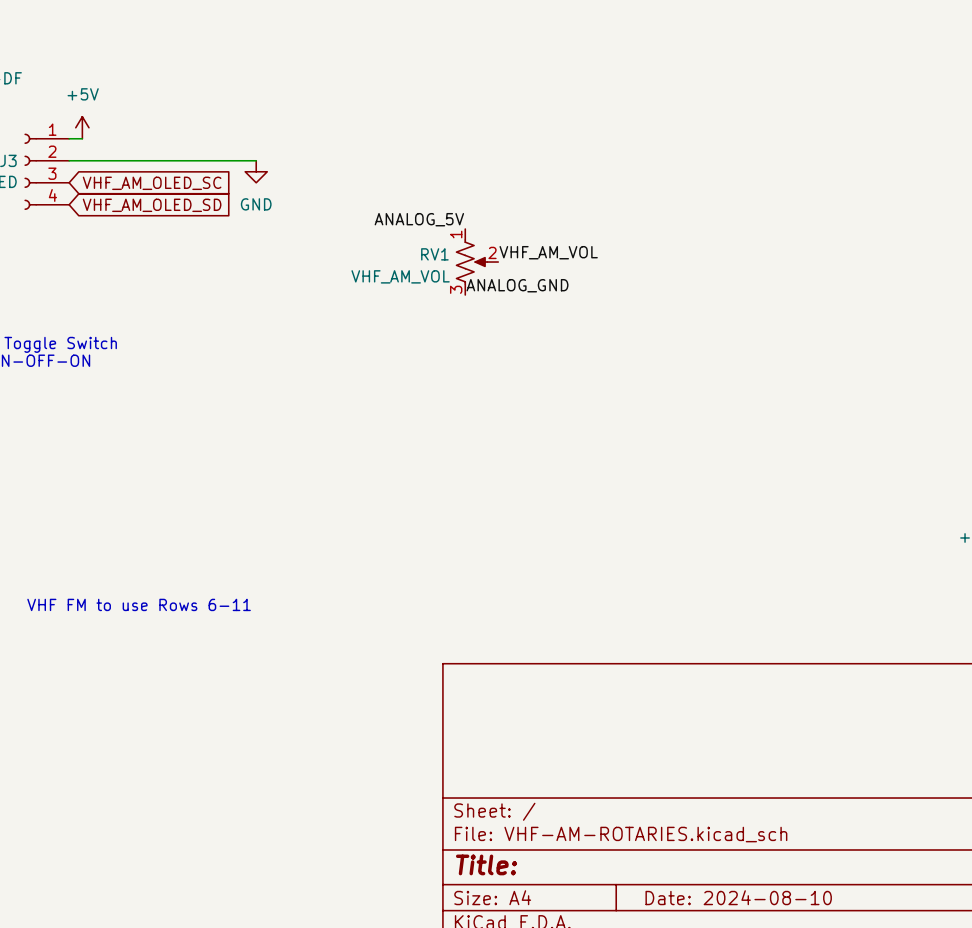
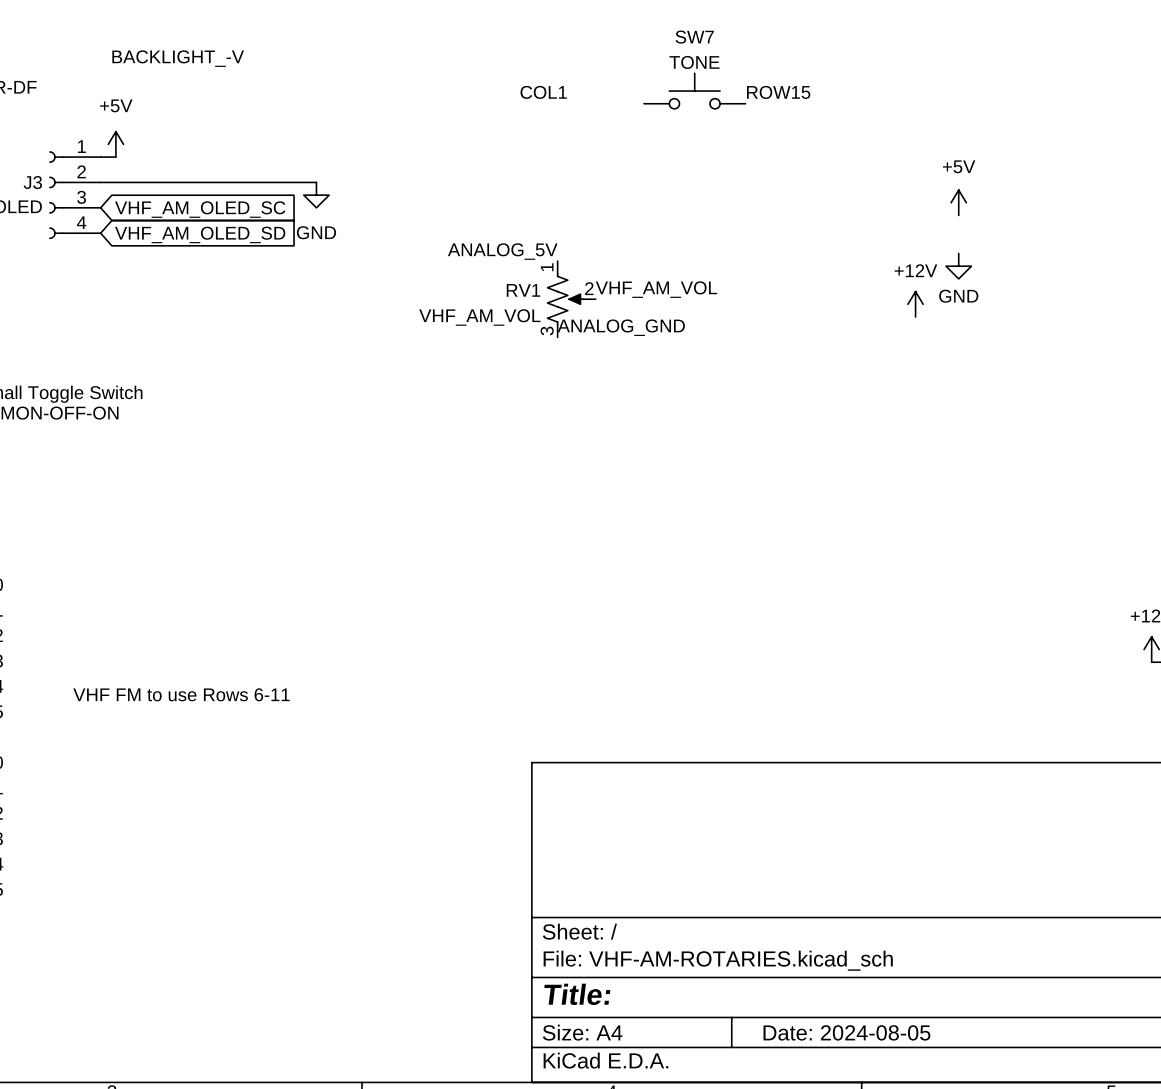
label: none -> BACKLIGHT_-V (178, 58)
SW7: none -> TONE (694, 91)
label: none -> COL1 (543, 92)
label: none -> ROW15 (778, 92)
power symbol: none -> +5V (958, 202)
power symbol: none -> GND (958, 266)
power symbol: none -> +12V (915, 304)
title block: Date: 2024-08-10 (738, 897) -> Date: 2024-08-05 (846, 1032)

